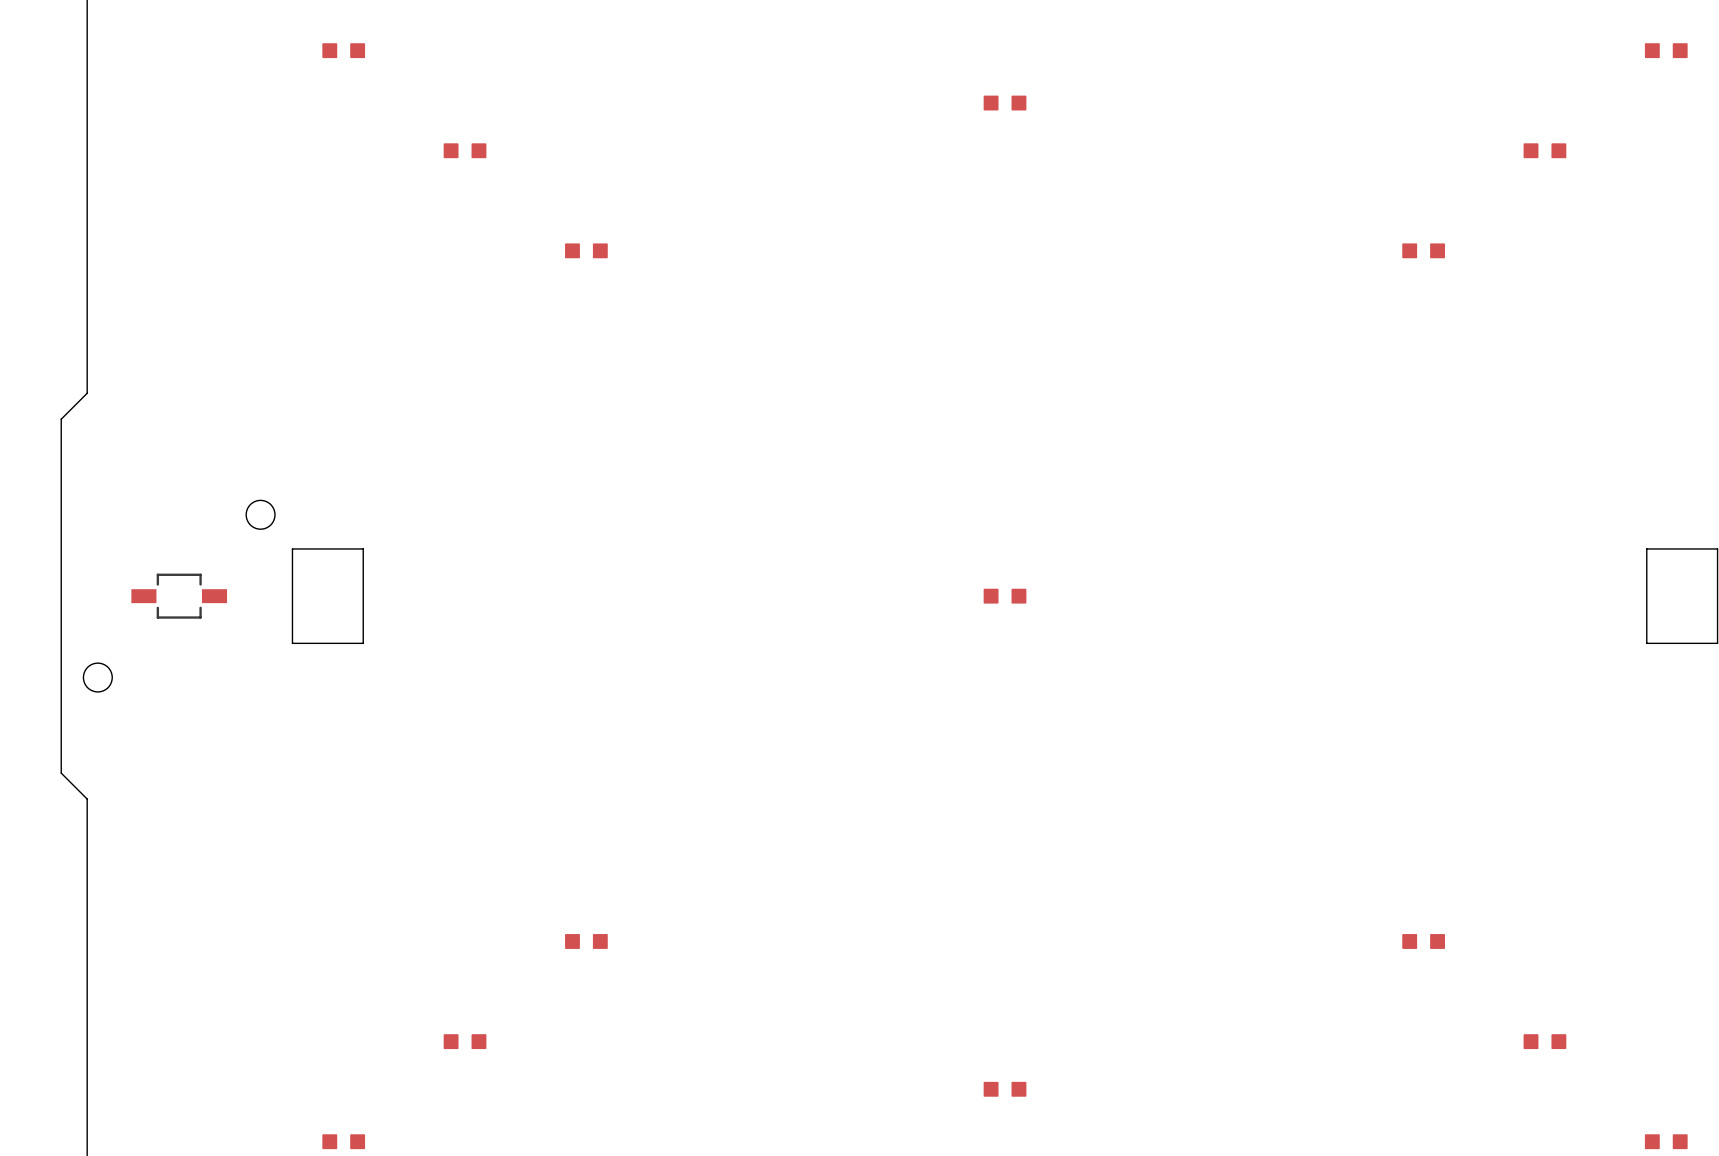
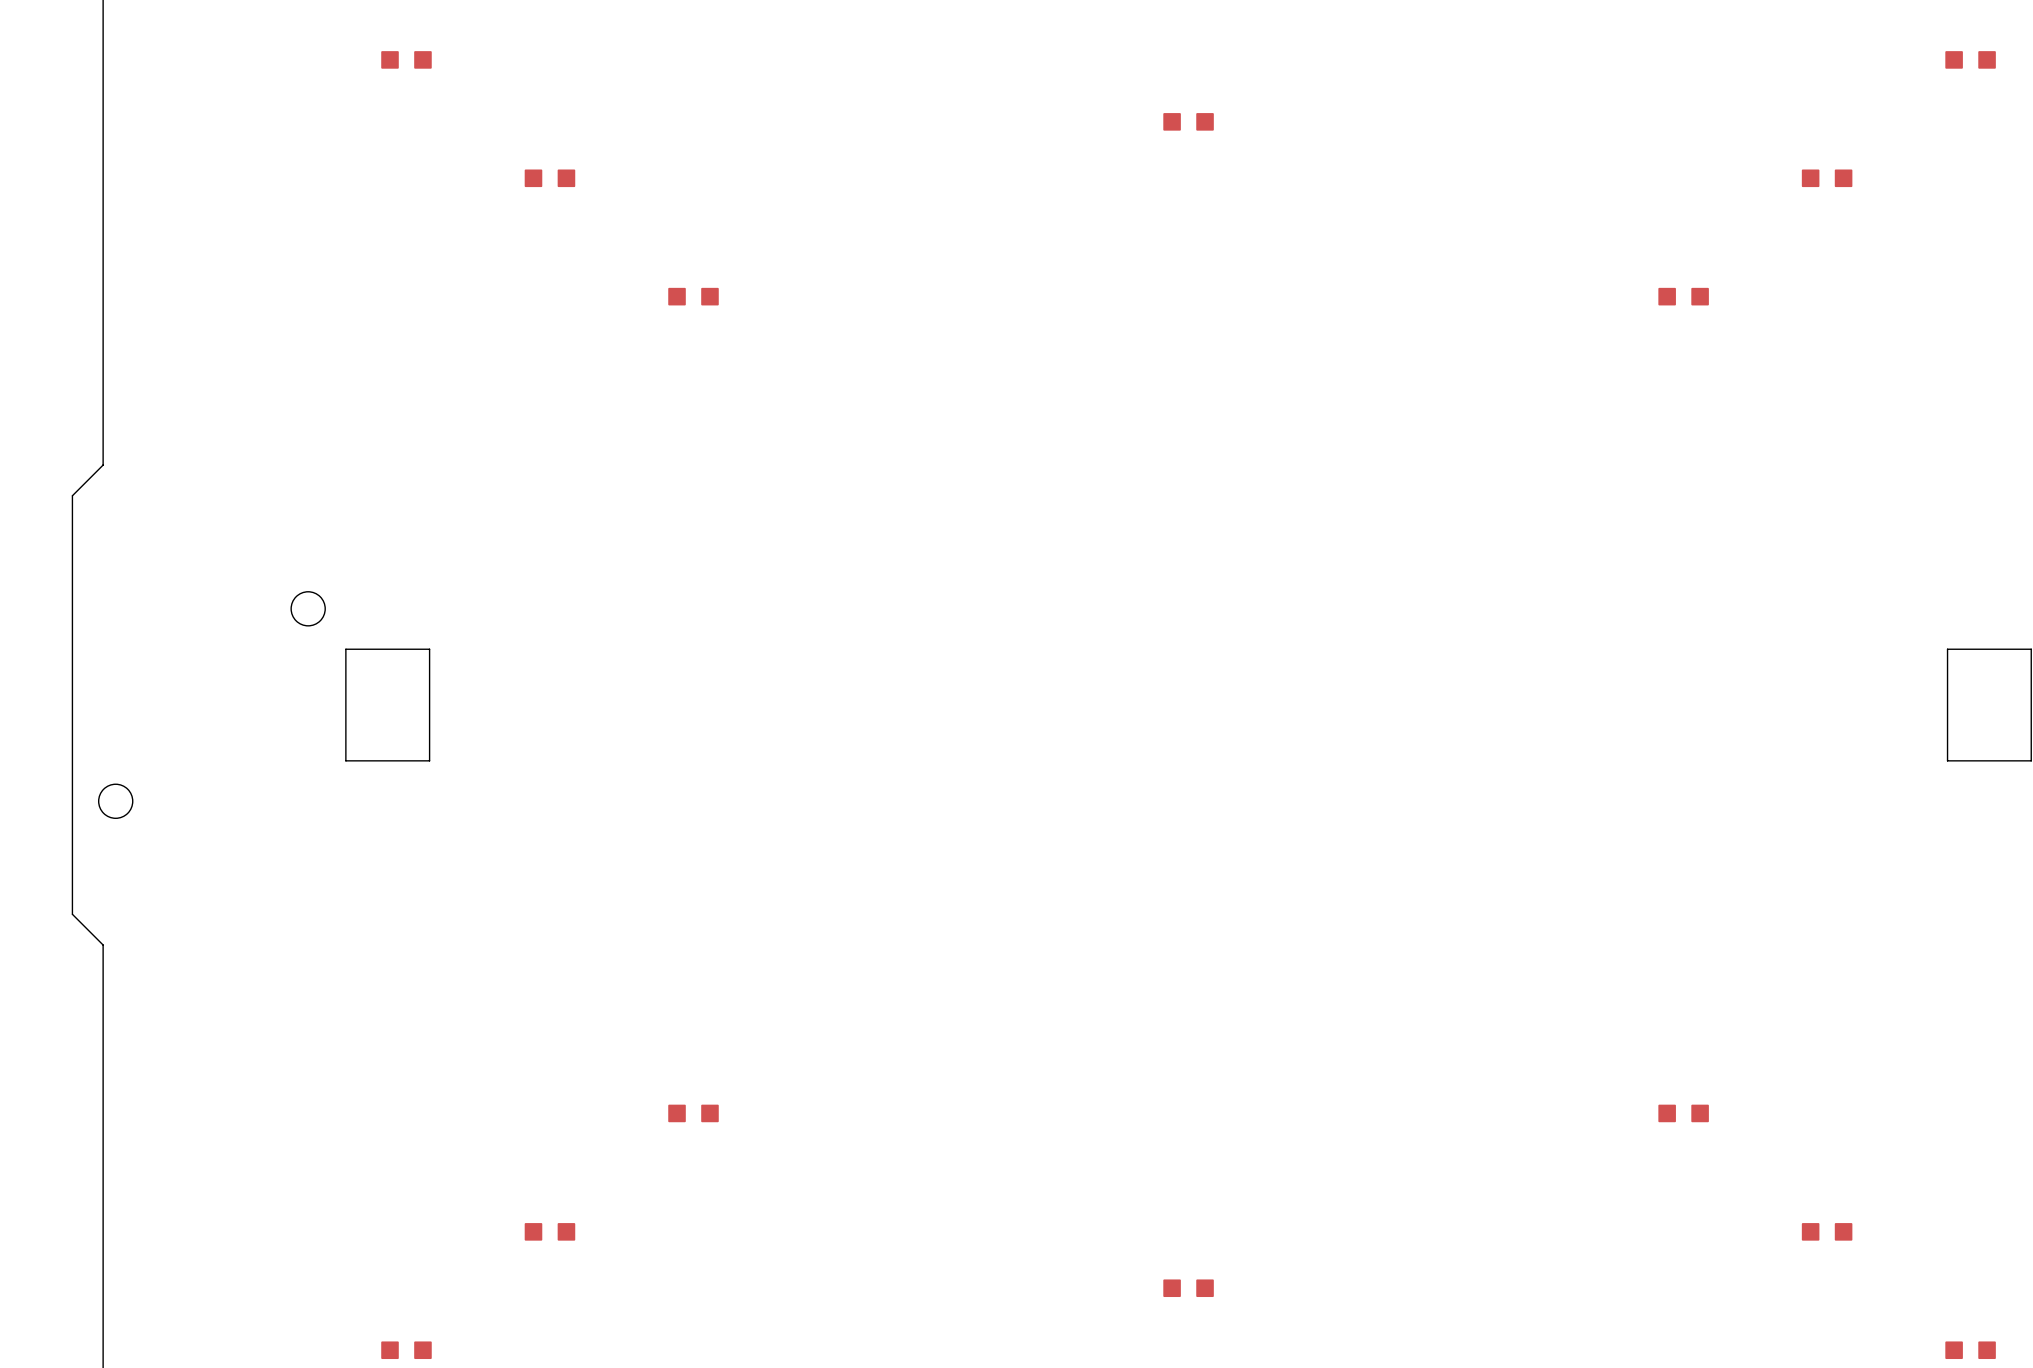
part: (179, 596) -> none
part: (1005, 596) -> none

